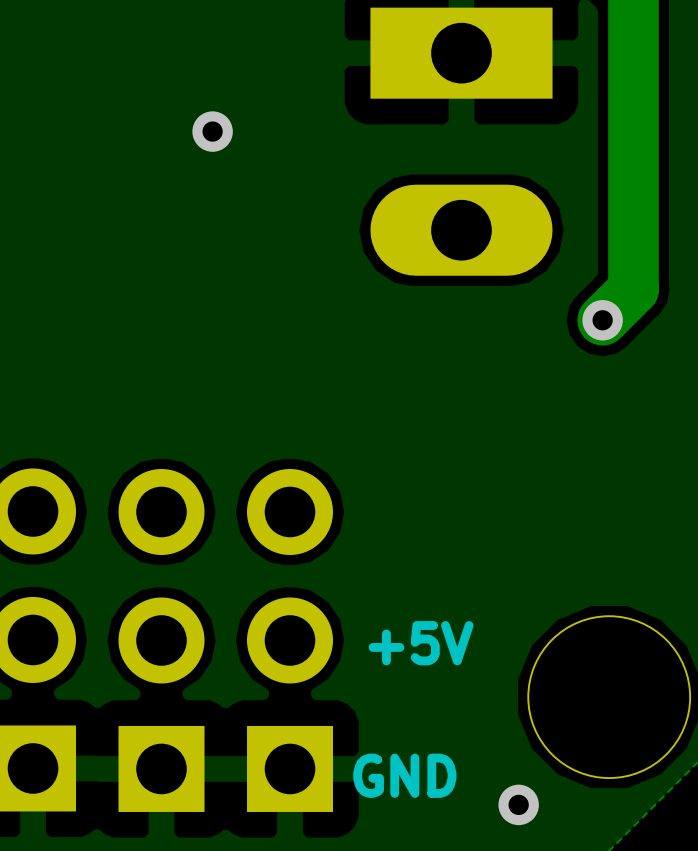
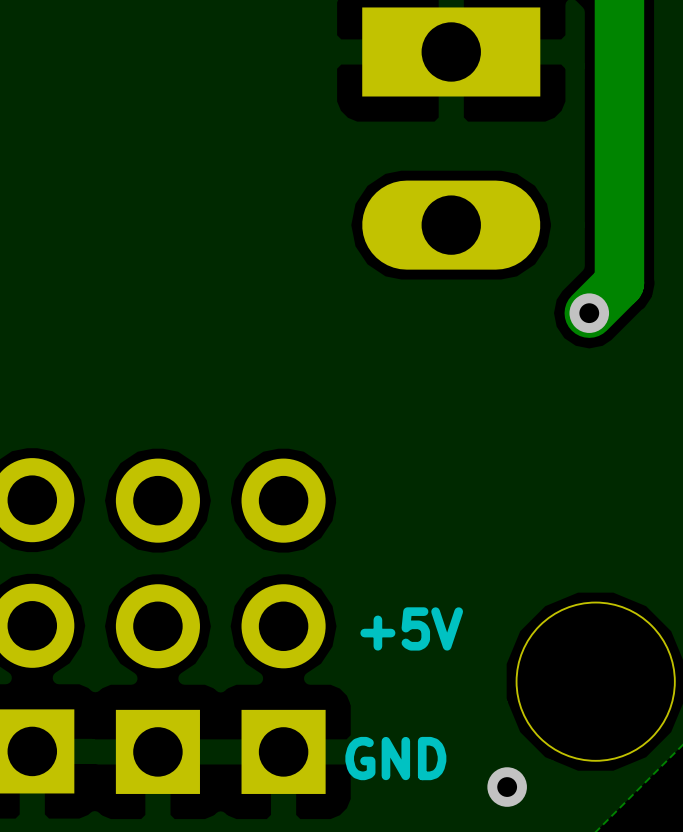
via: (212, 131) -> none

